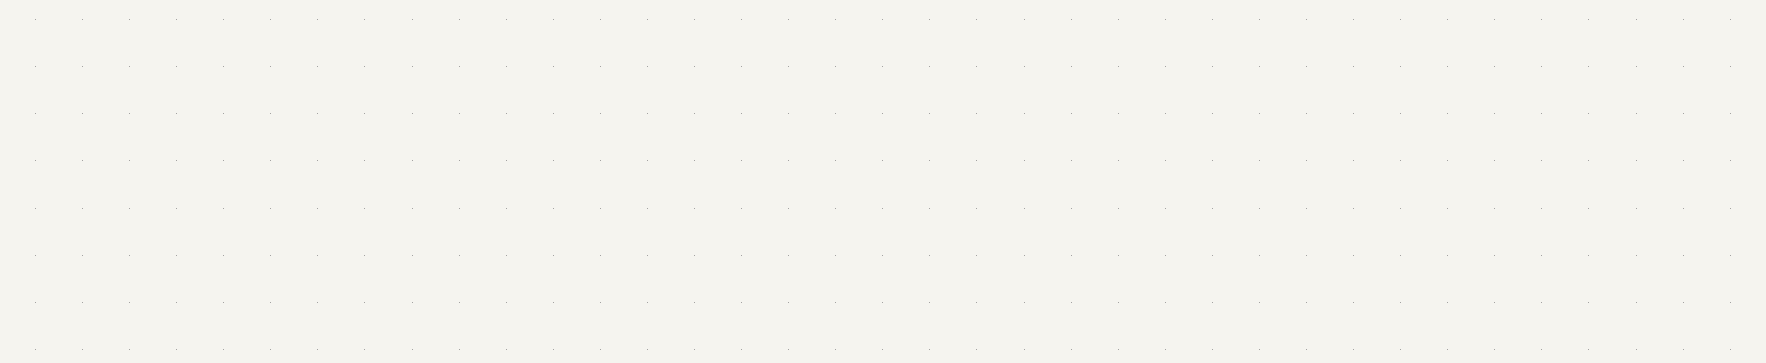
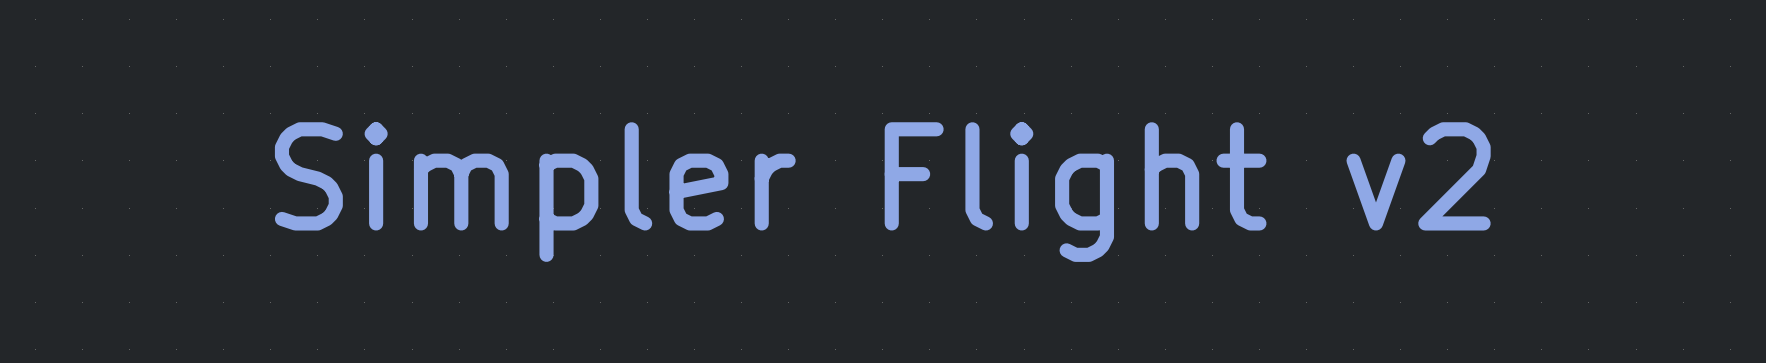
text: none -> Simpler Flight v2 (882, 192)

